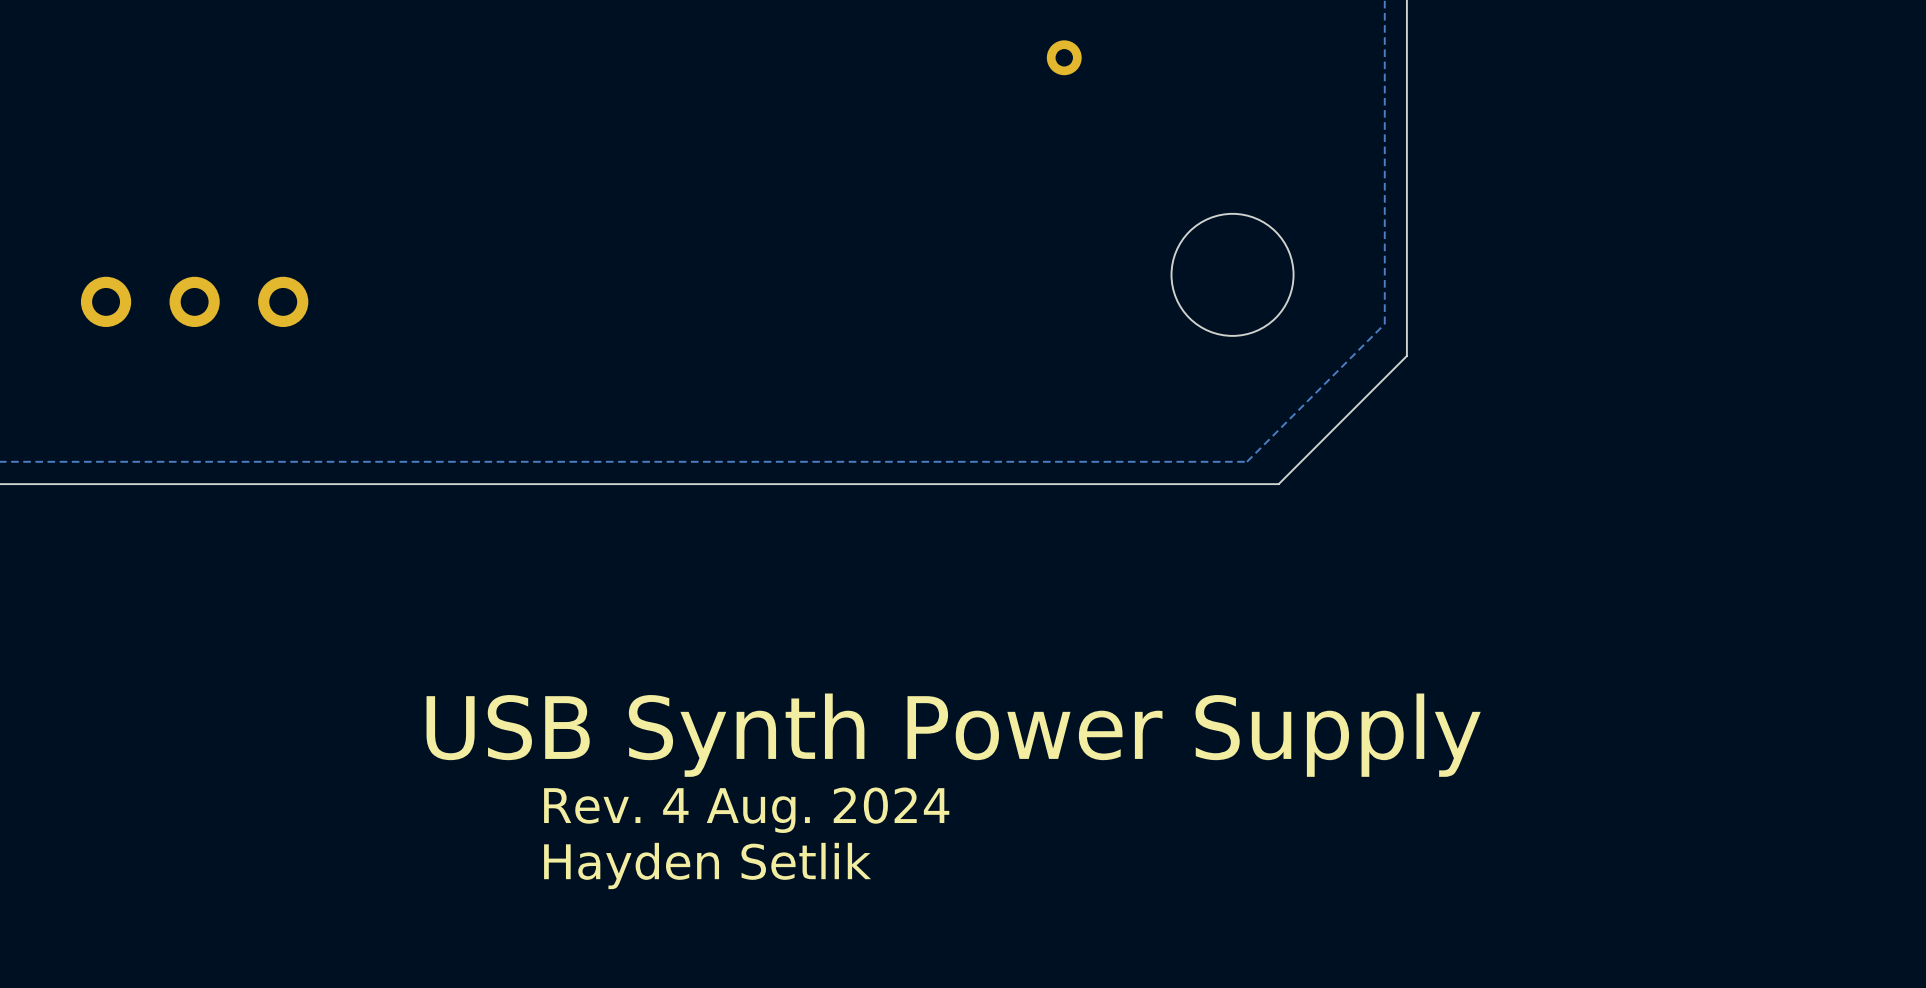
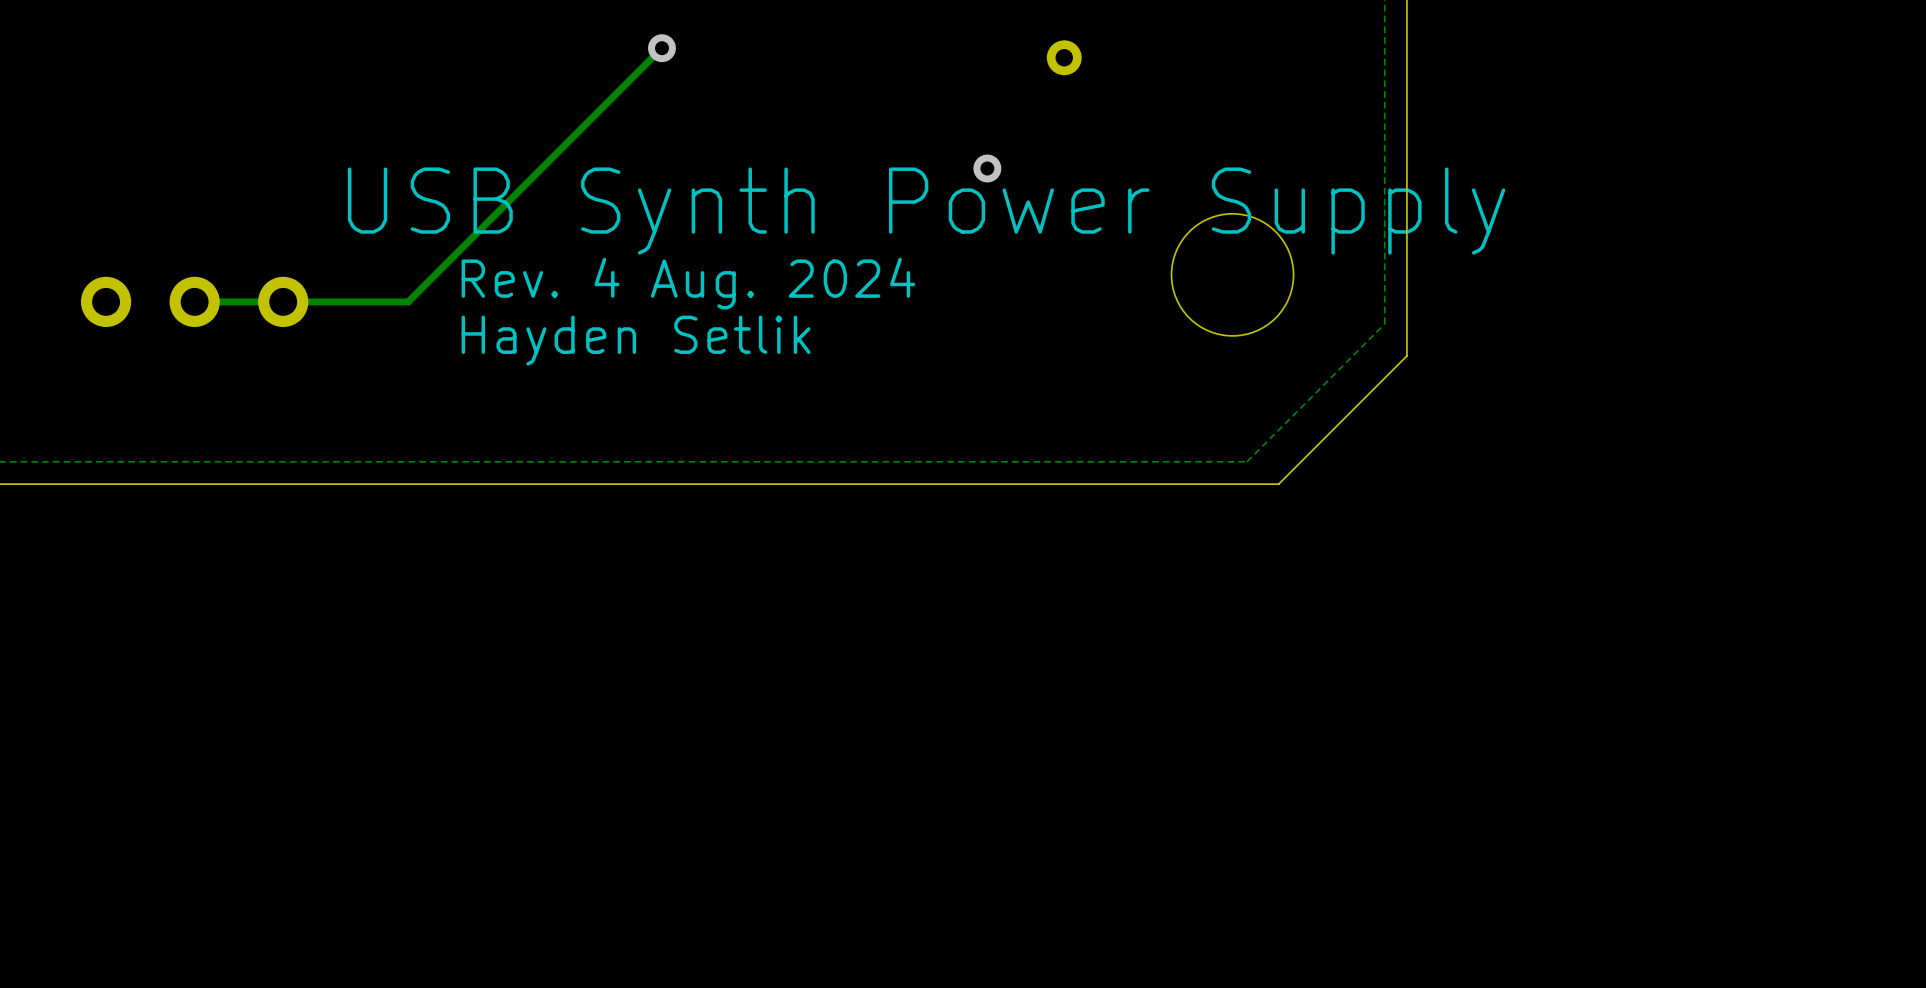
track: none -> (661, 48) (408, 301) (194, 301)
via: none -> (661, 48)
via: none -> (987, 168)
text position: USB Synth Power Supply (953, 735) -> USB Synth Power Supply (926, 211)
text position: Rev. 4 Aug. 2024 (746, 810) -> Rev. 4 Aug. 2024 (688, 283)
text position: Hayden Setlik (707, 865) -> Hayden Setlik (636, 340)

